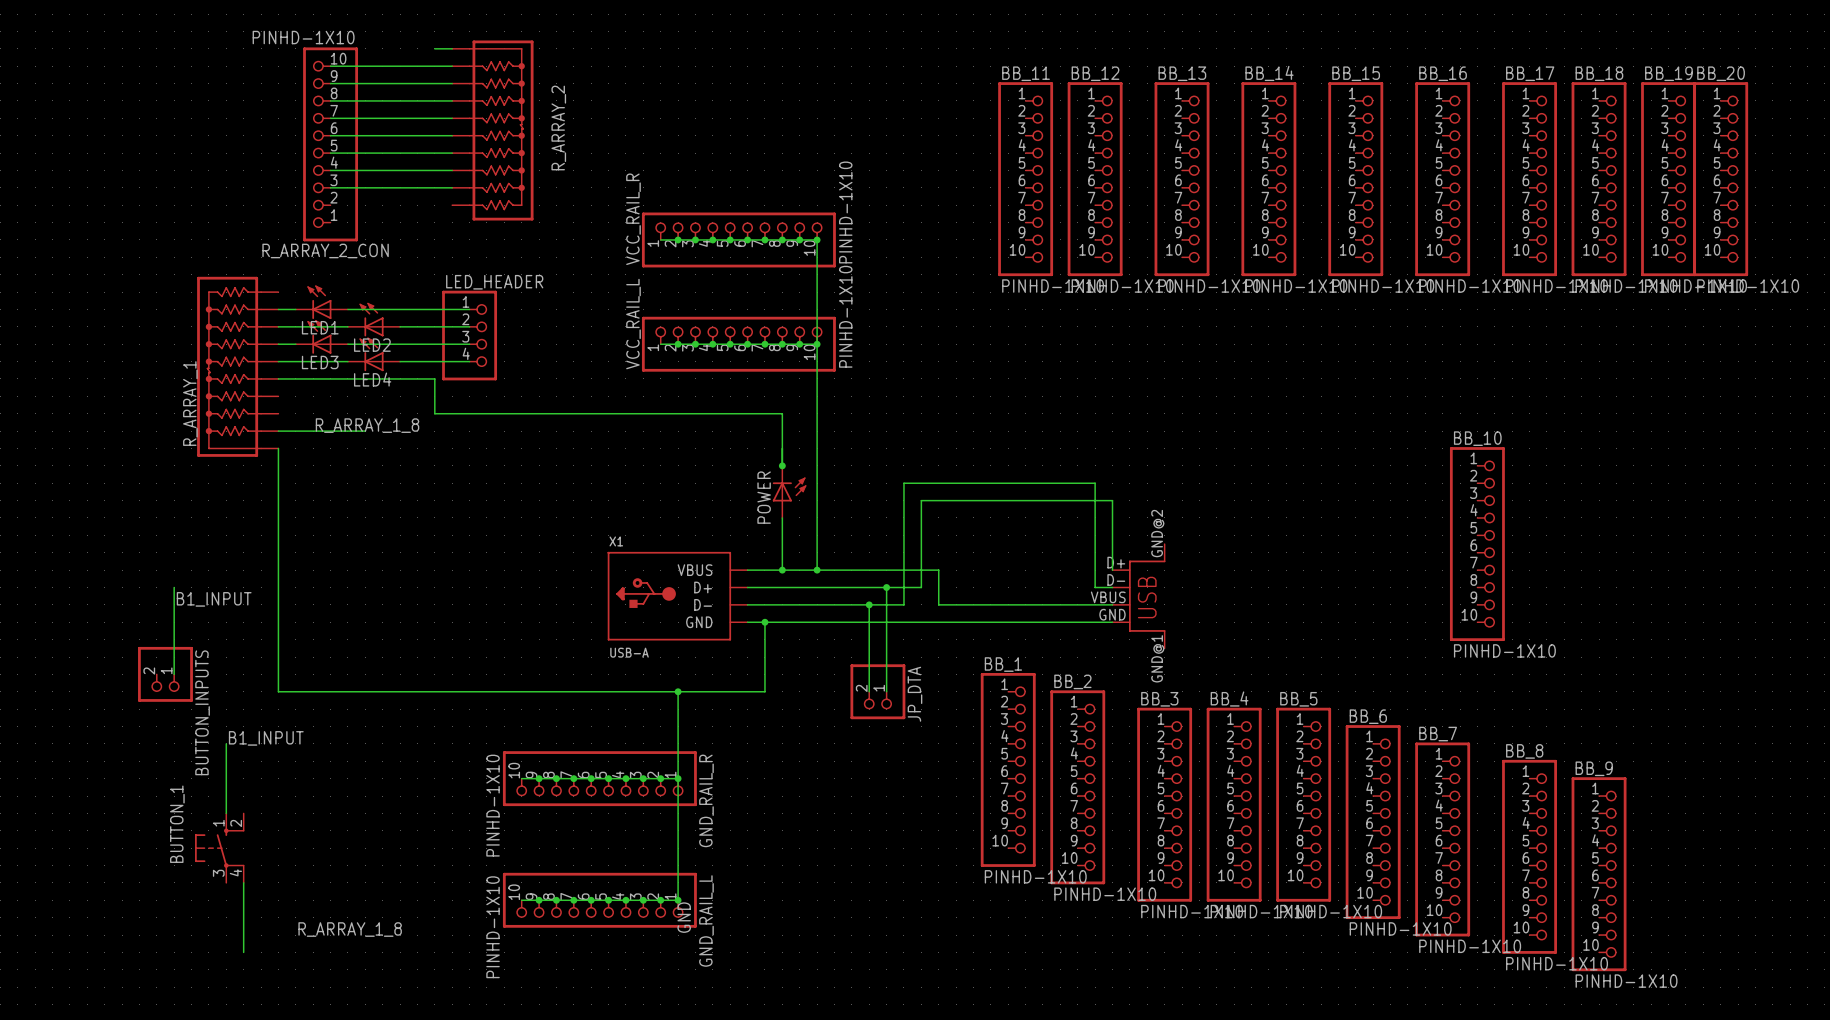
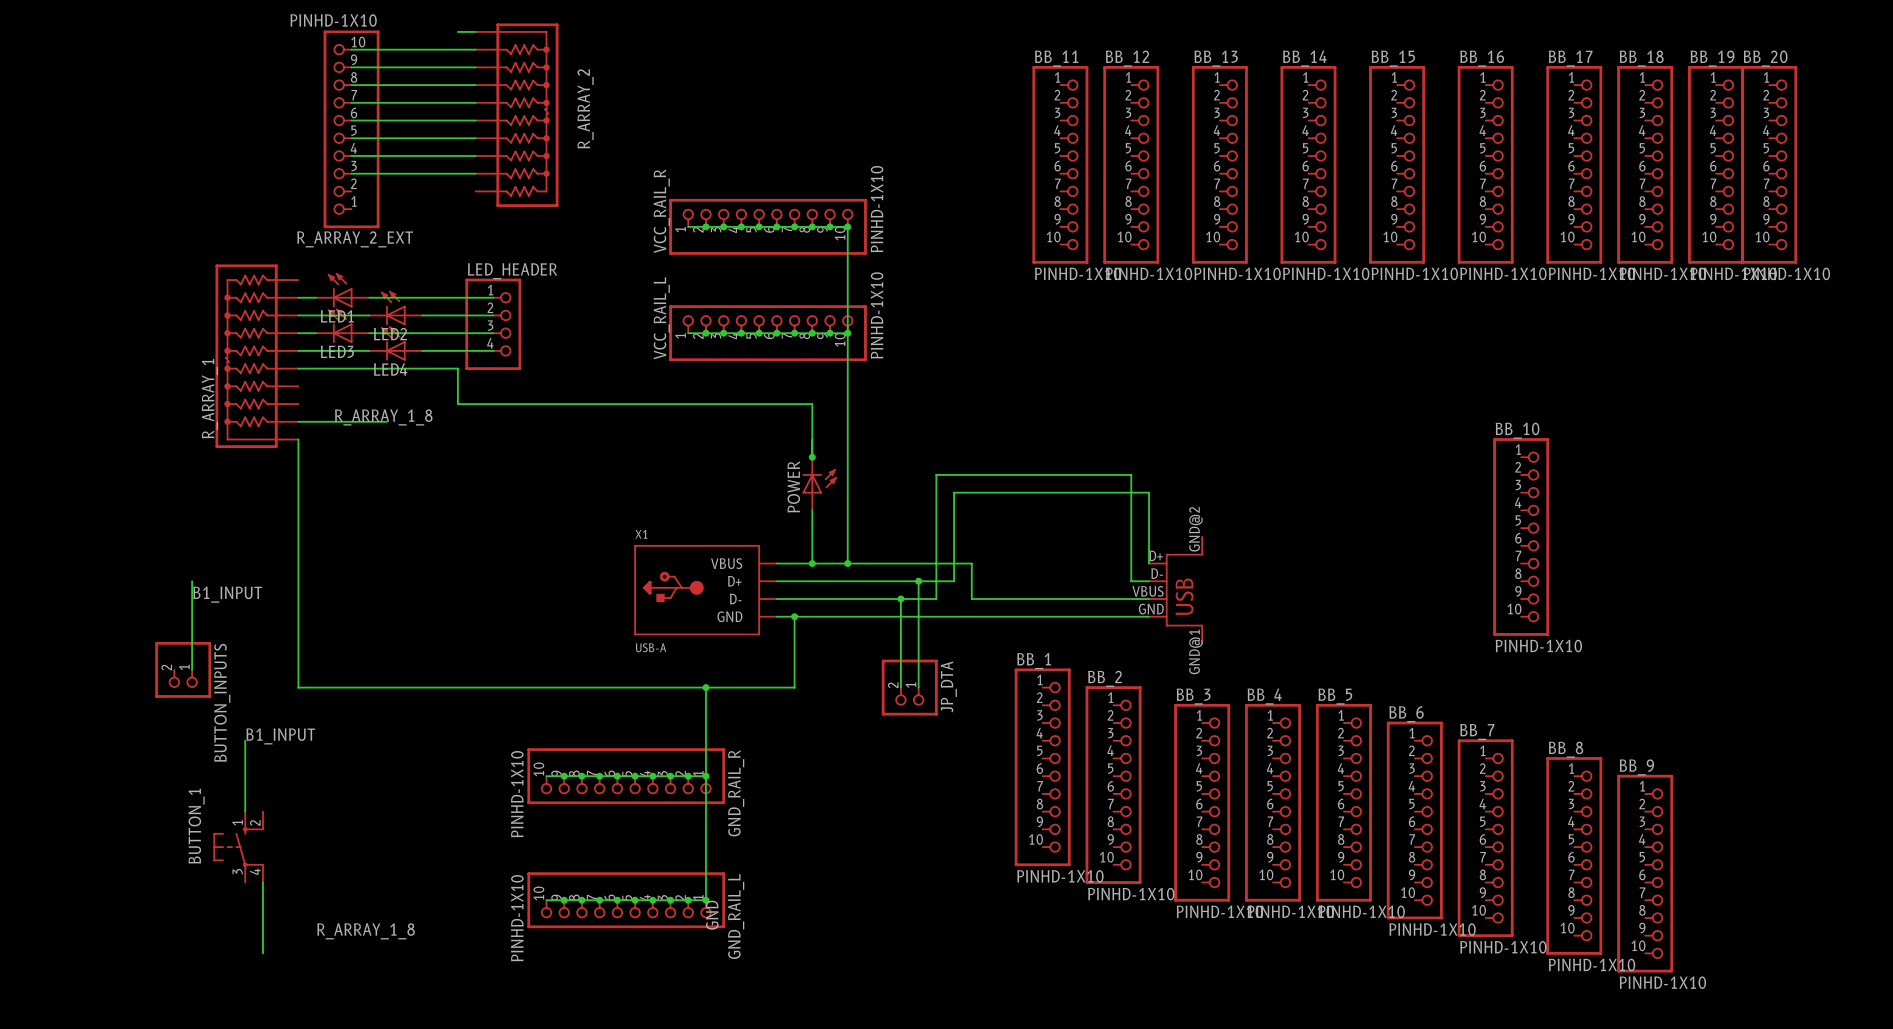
R_ARRAY_2_CON name: R_ARRAY_2_CON (325, 250) -> R_ARRAY_2_EXT (355, 239)

